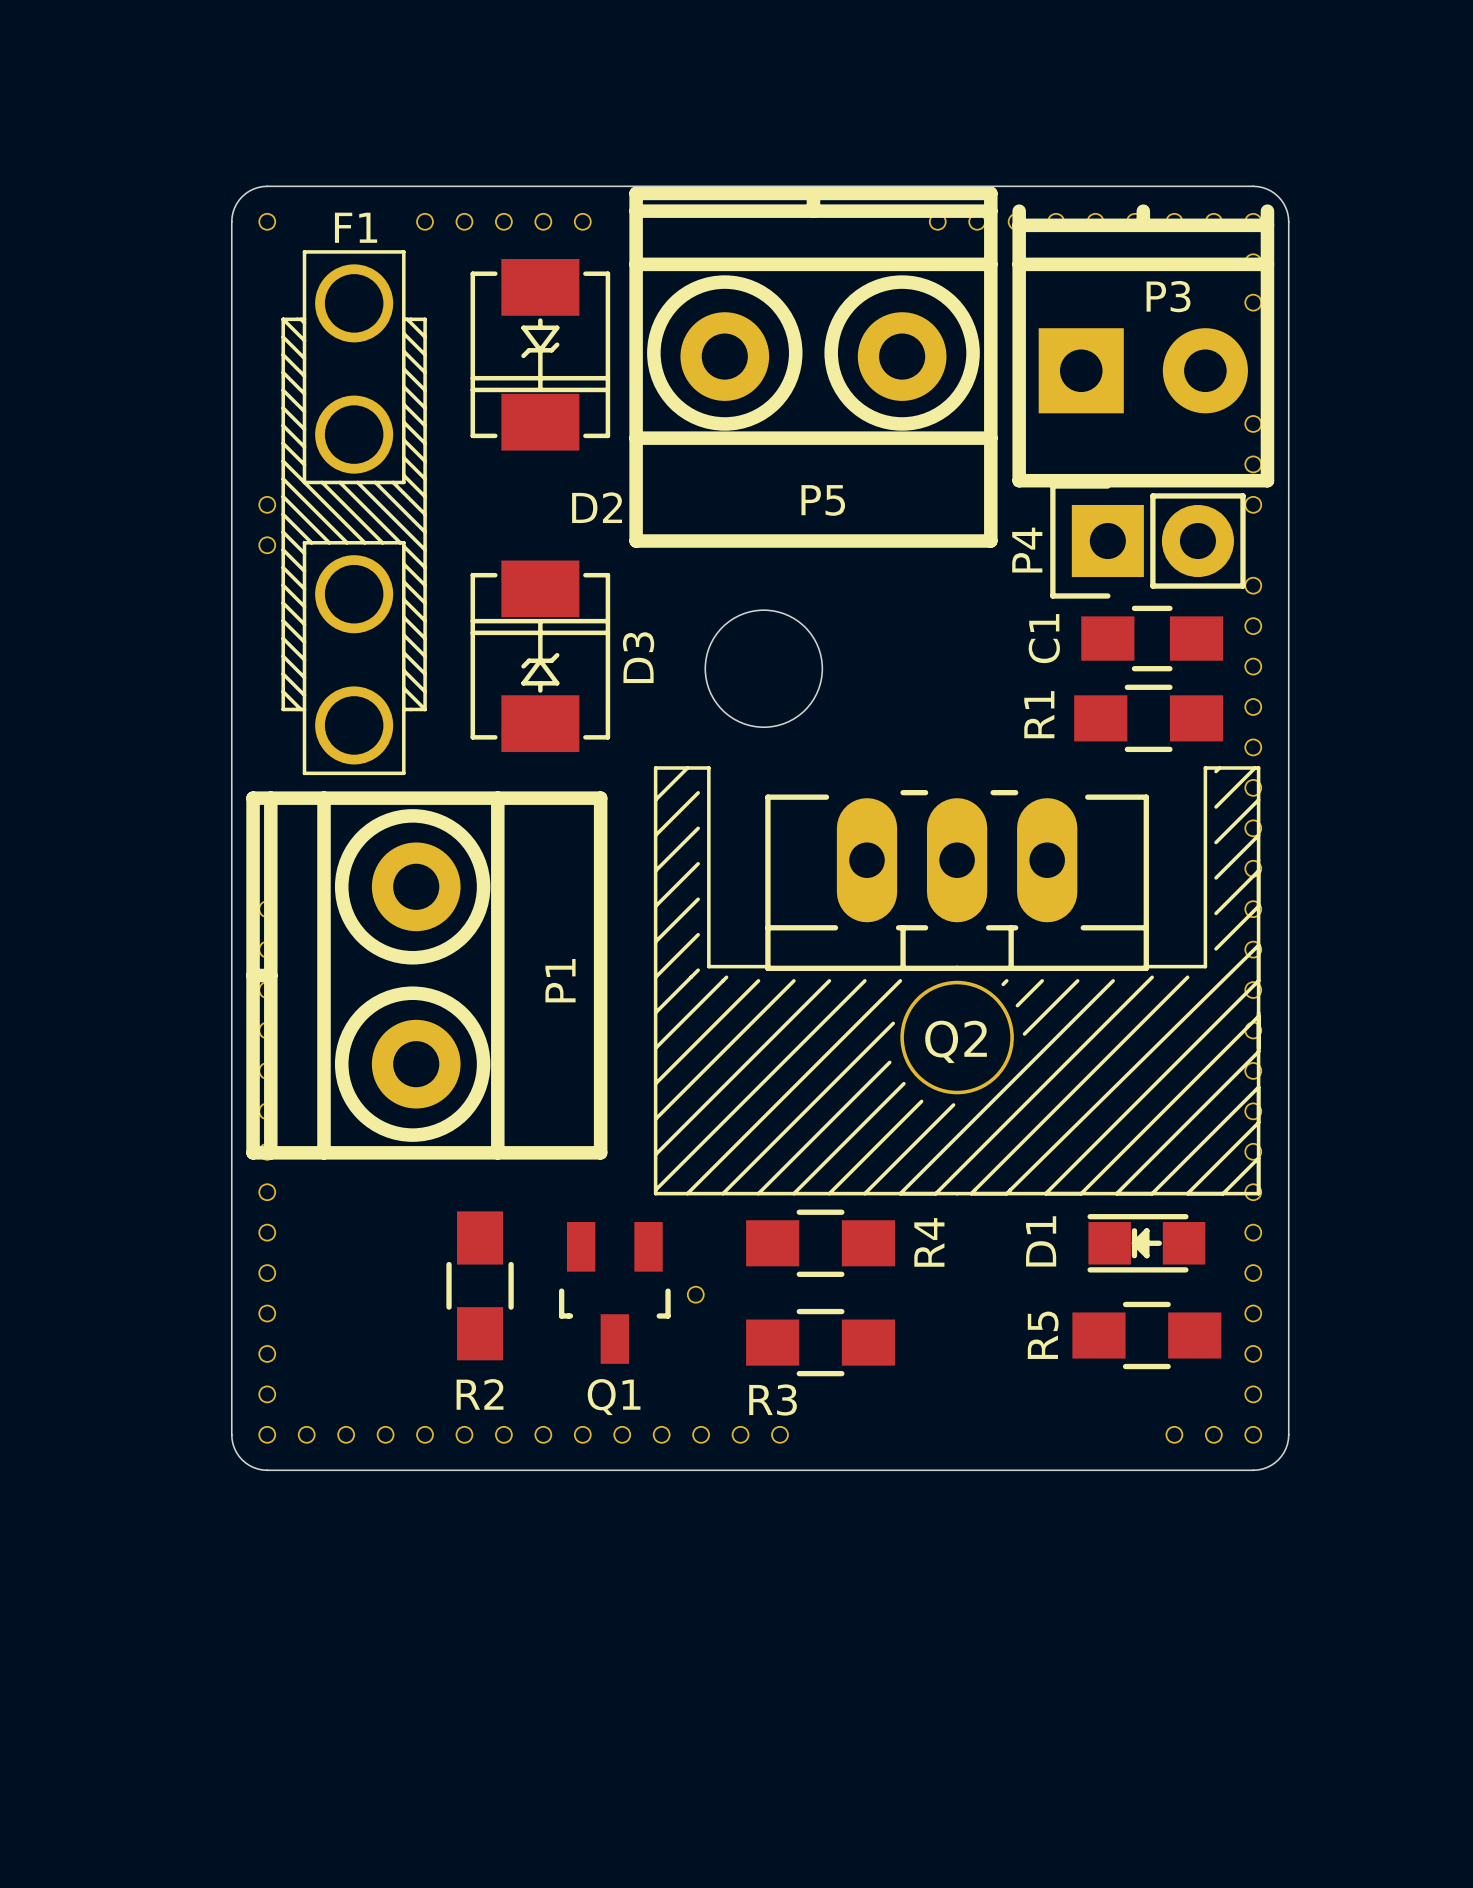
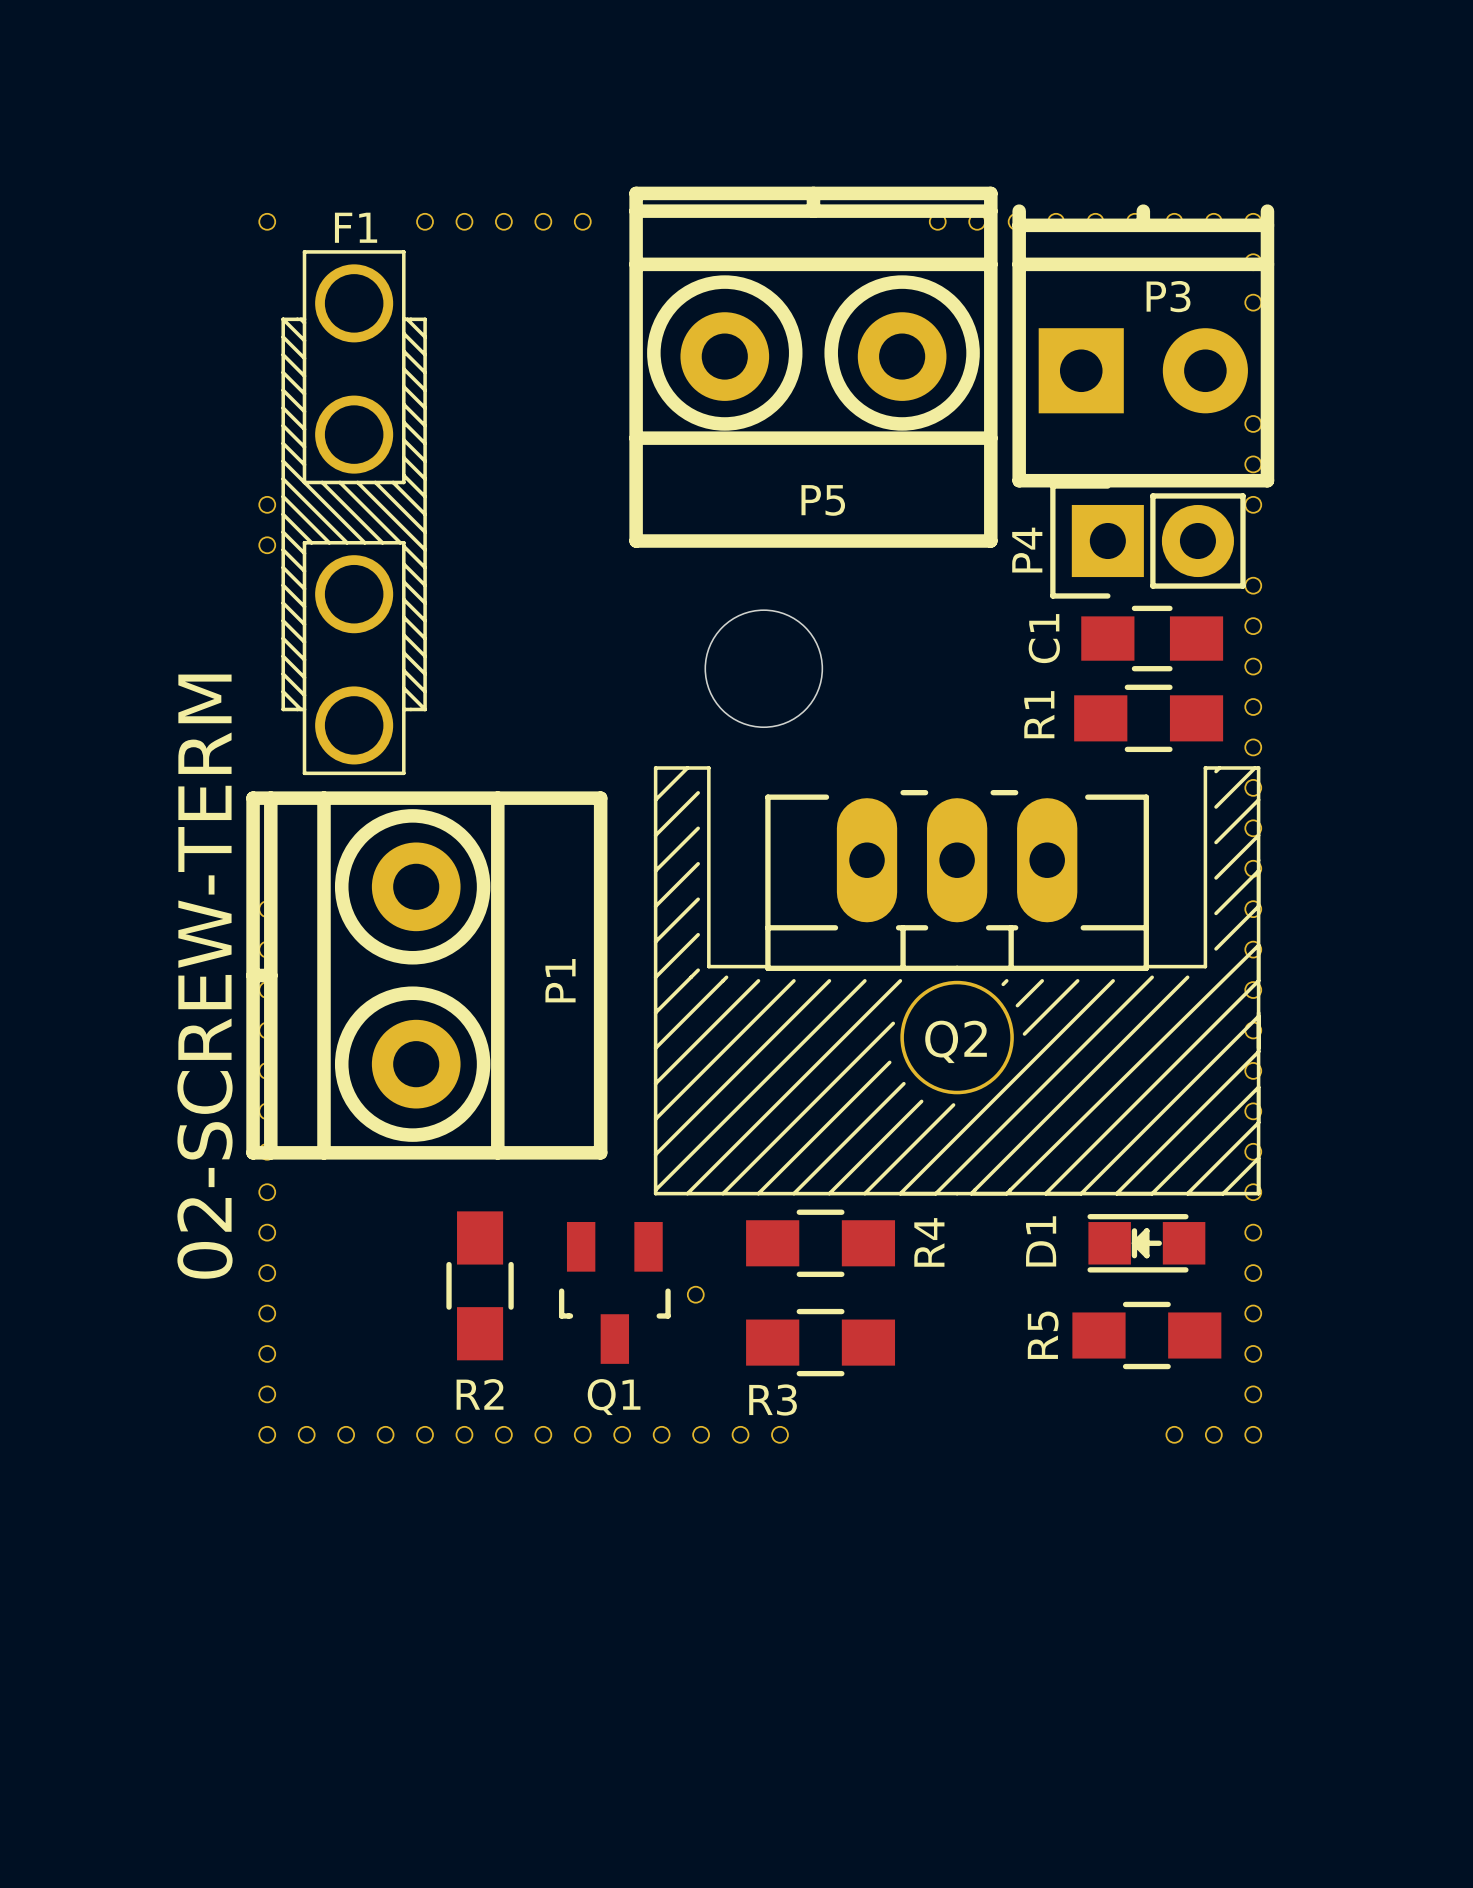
board edge: (267, 186) (1253, 186) (1266, 189) (1281, 200) (1287, 212) (1288, 221) (1288, 1434) (1283, 1452) (1274, 1462) (1266, 1467) (1253, 1470) (267, 1470) (253, 1467) (239, 1456) (232, 1443) (231, 1434) (231, 221) (234, 208) (242, 196) (253, 189) (267, 186) -> none
D2: (540, 354) -> none
D3: (540, 656) -> none
P1 value: none -> 02-SCREW-TERM (205, 976)

